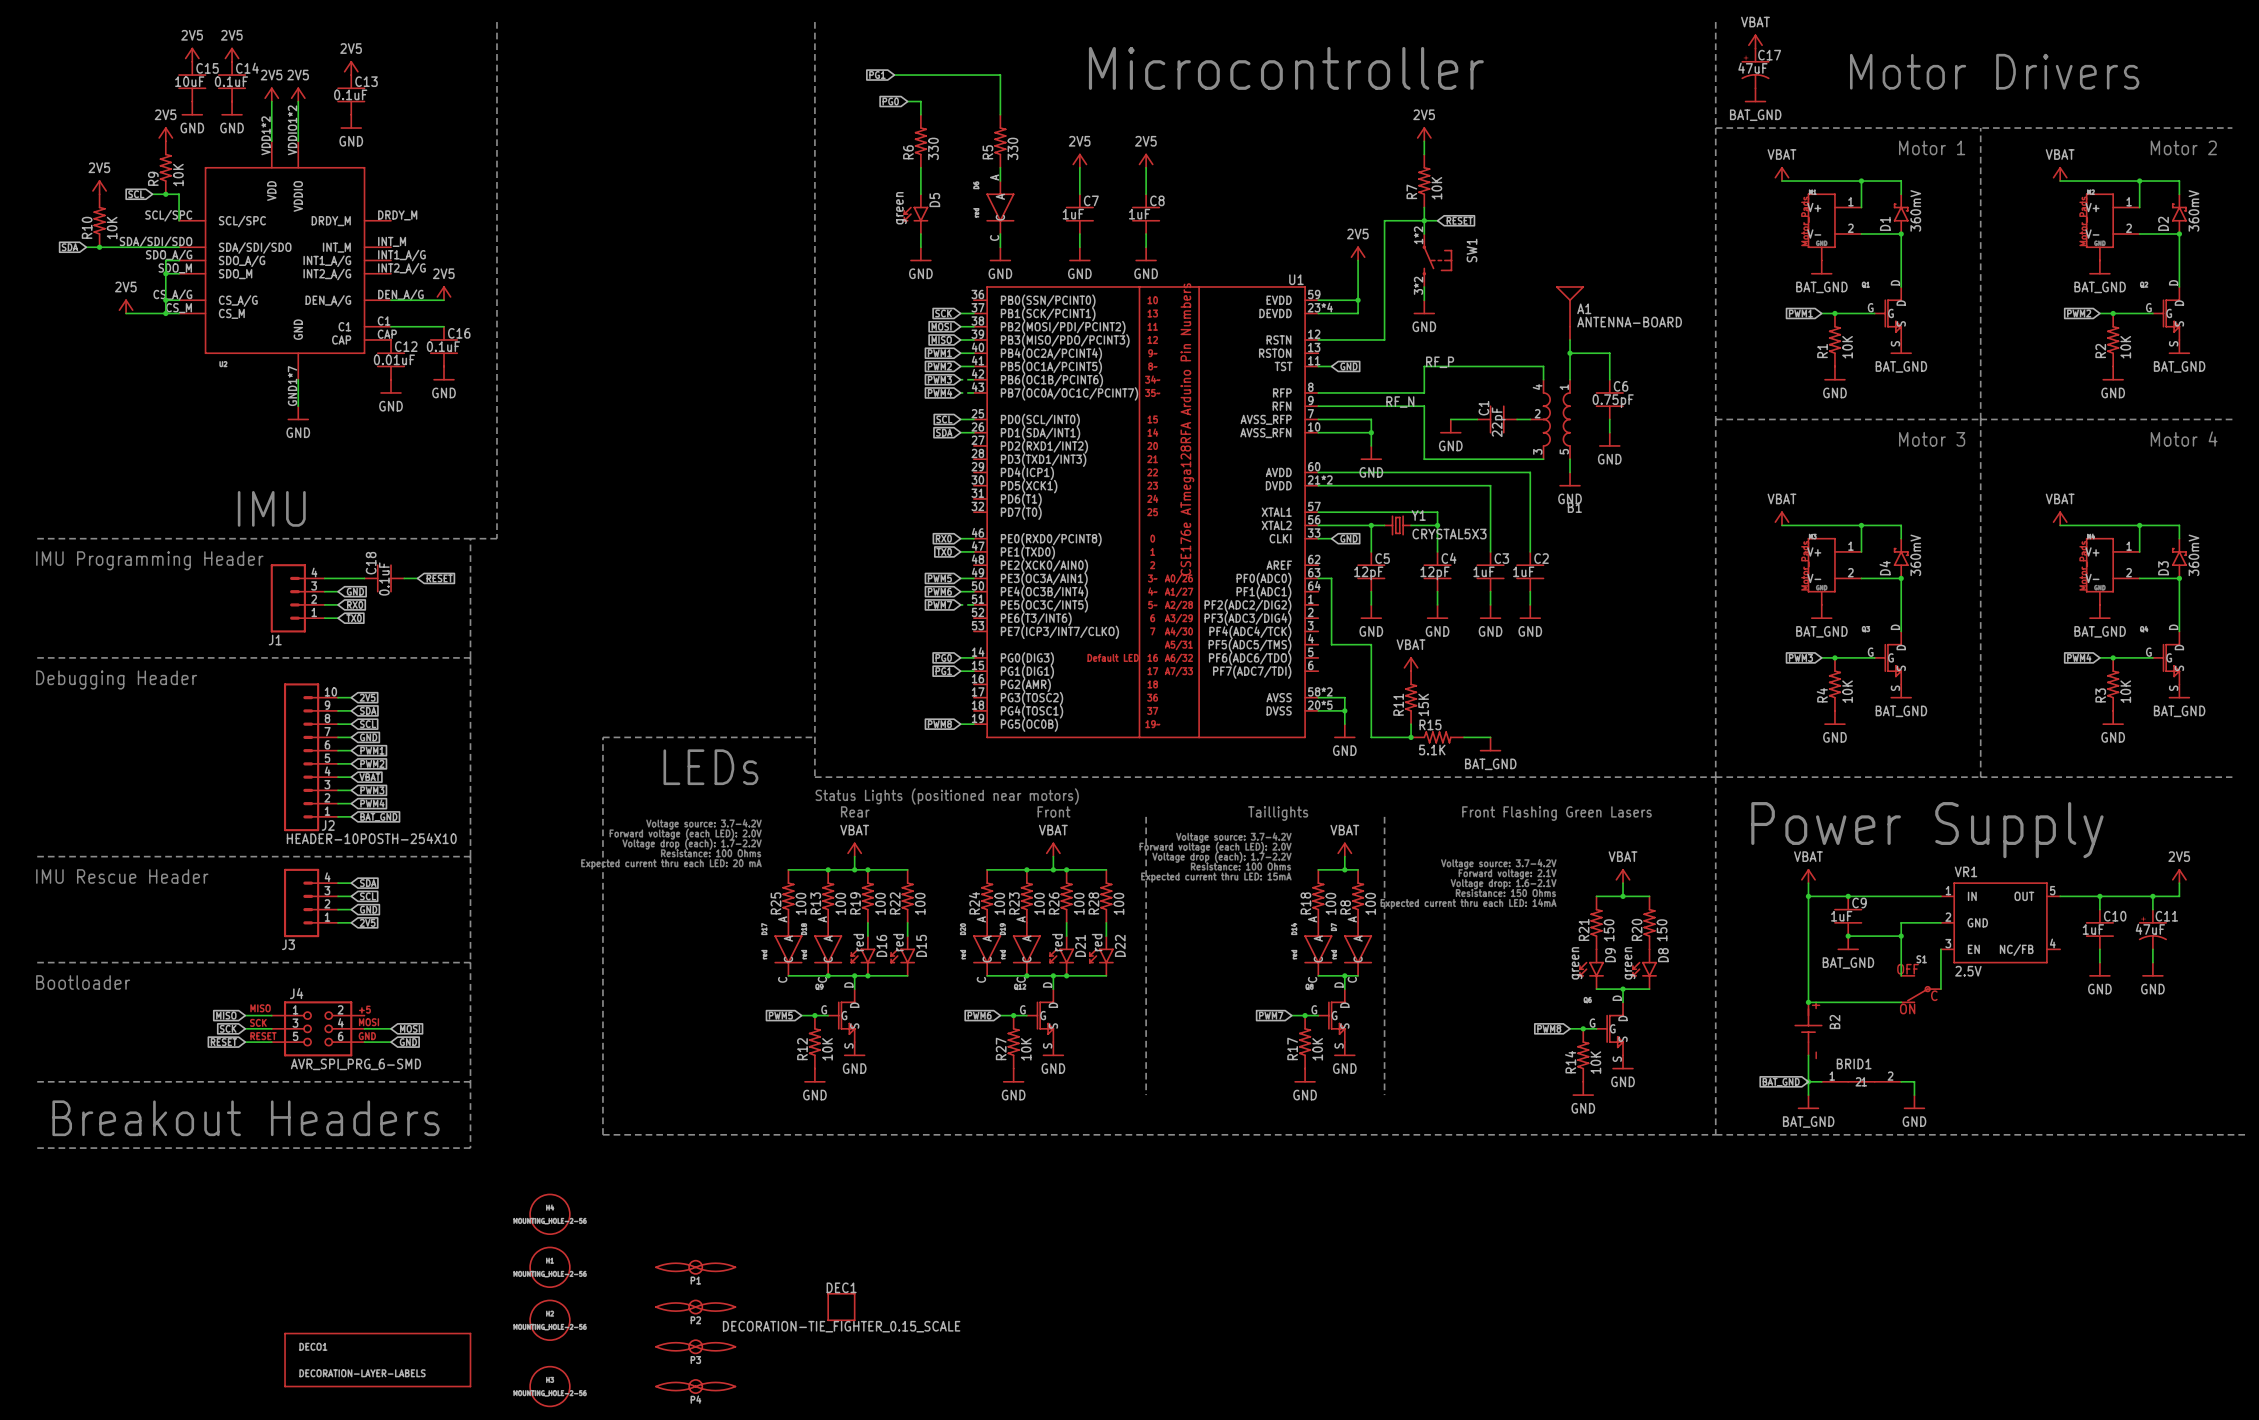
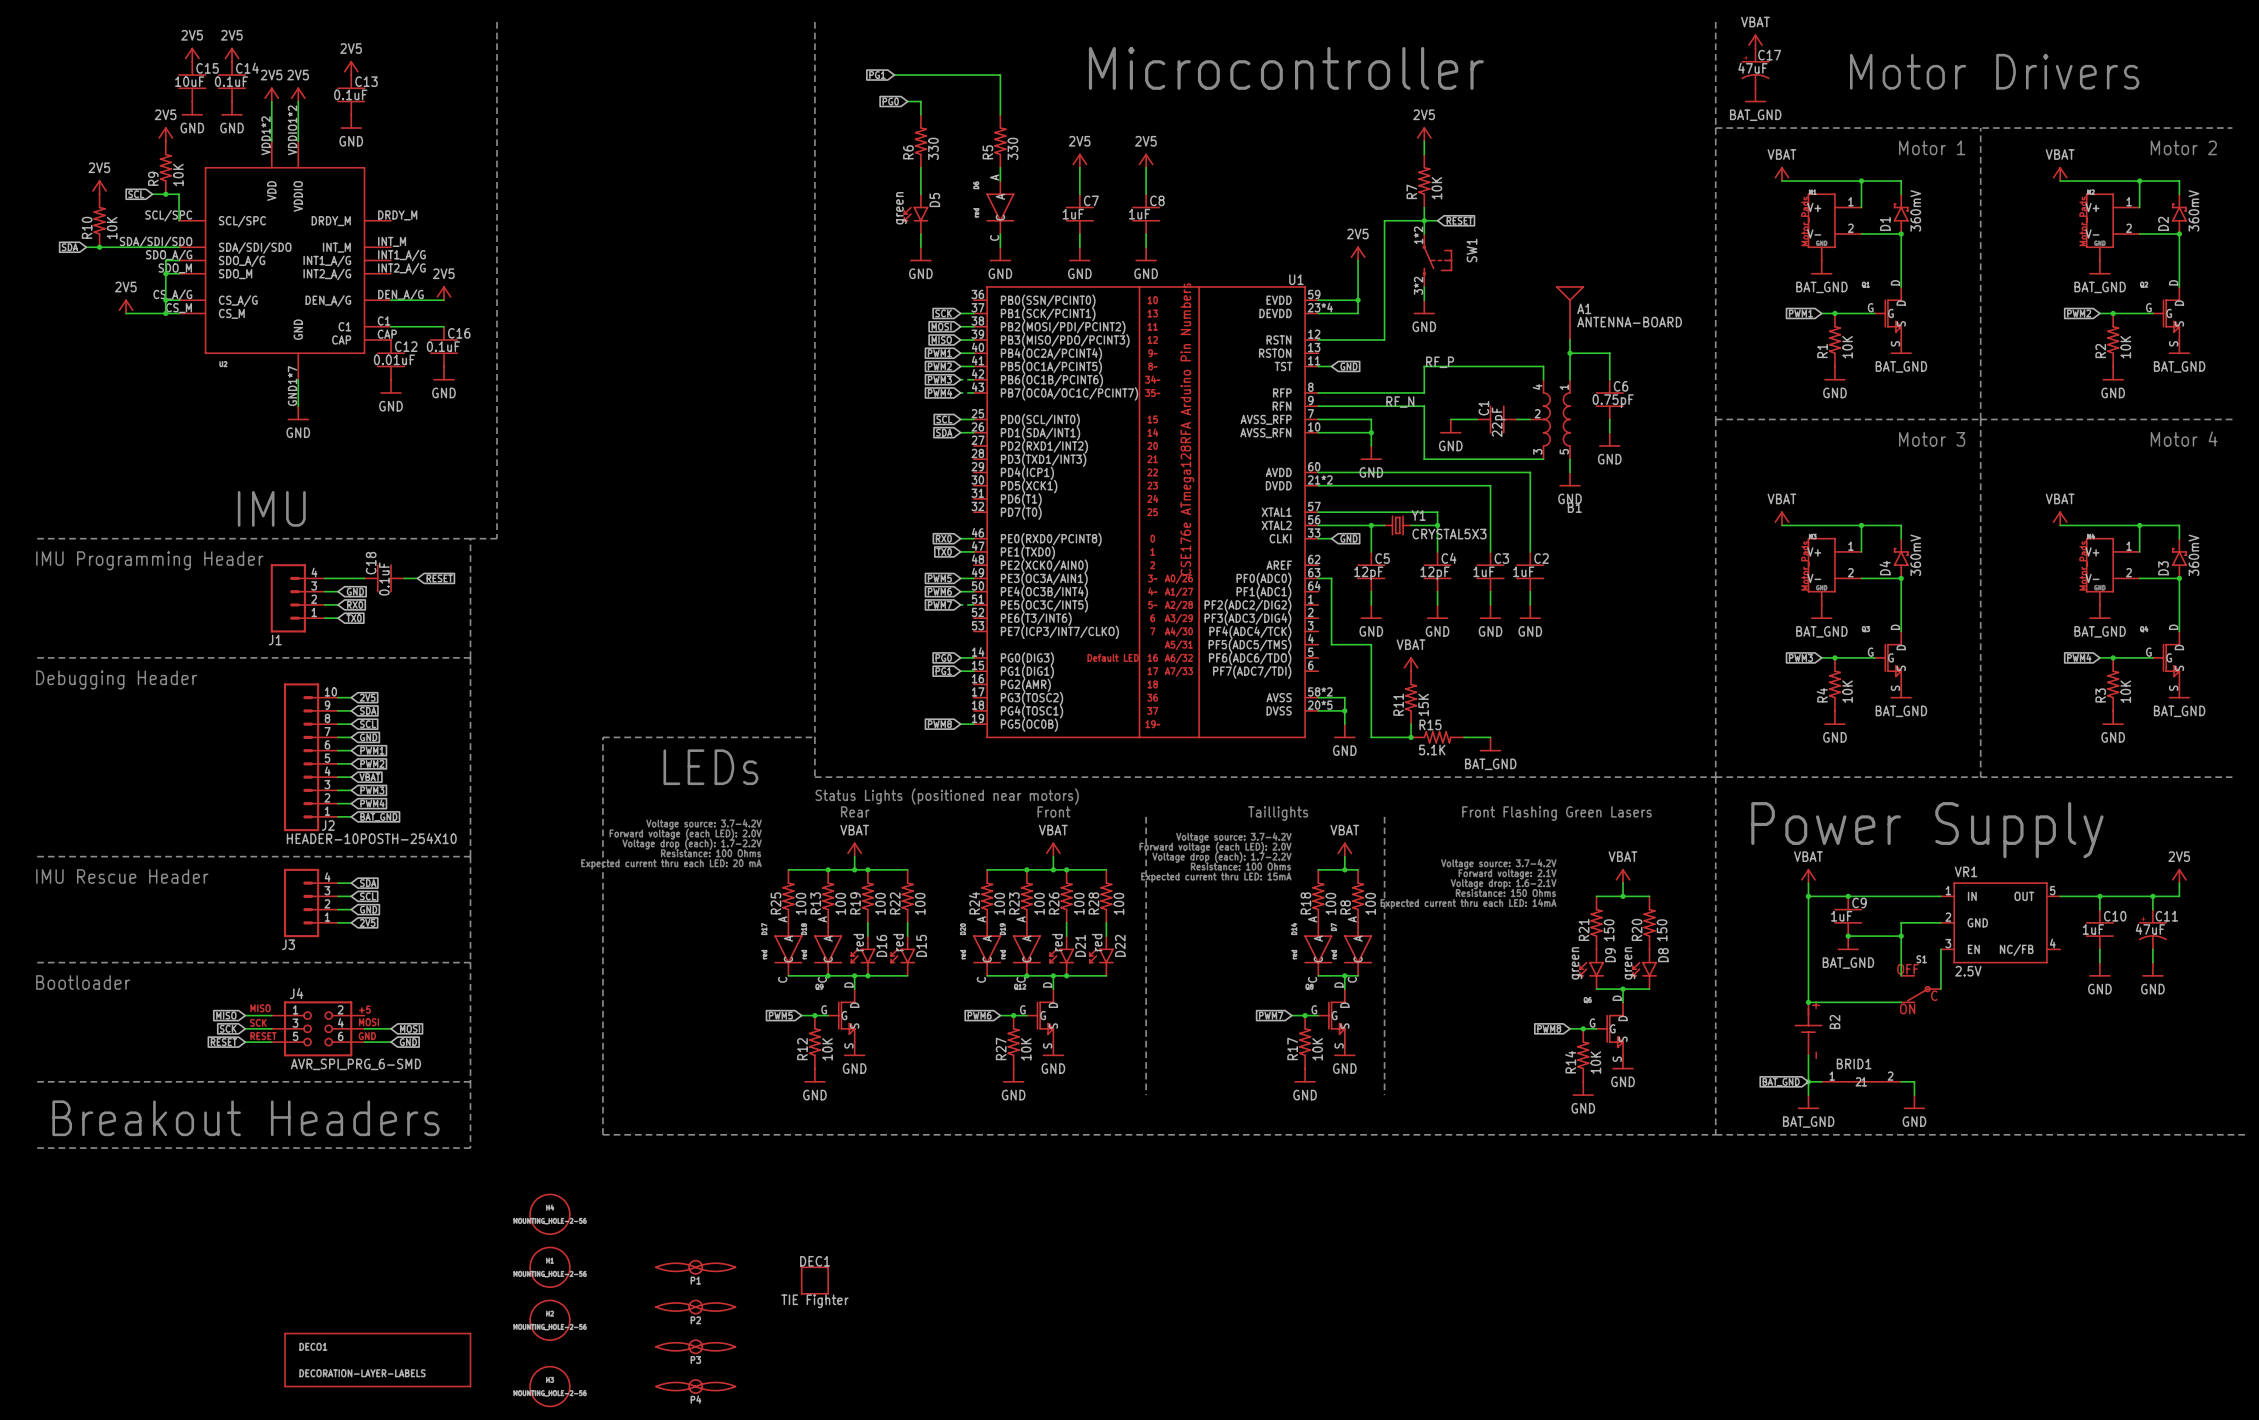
DEC1 position: (841, 1307) -> (814, 1280)
DEC1 value: DECORATION-TIE_FIGHTER_0.15_SCALE (841, 1326) -> TIE Fighter (814, 1301)

